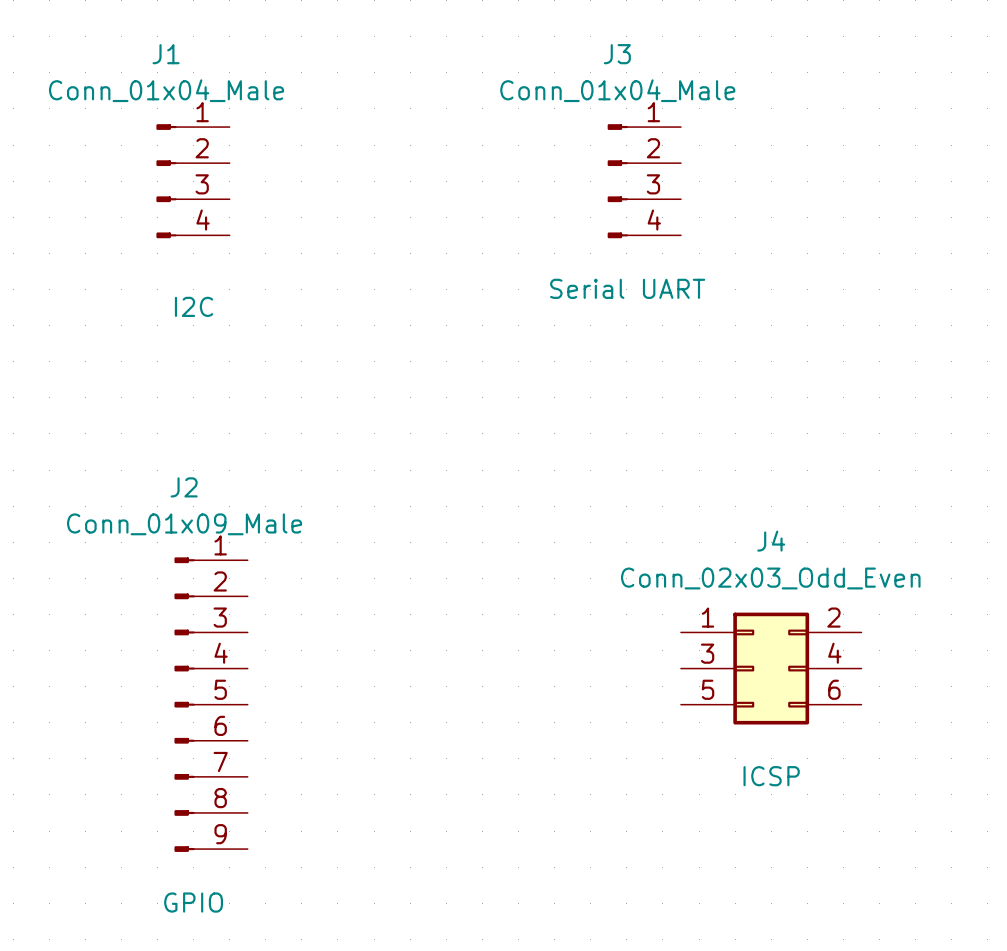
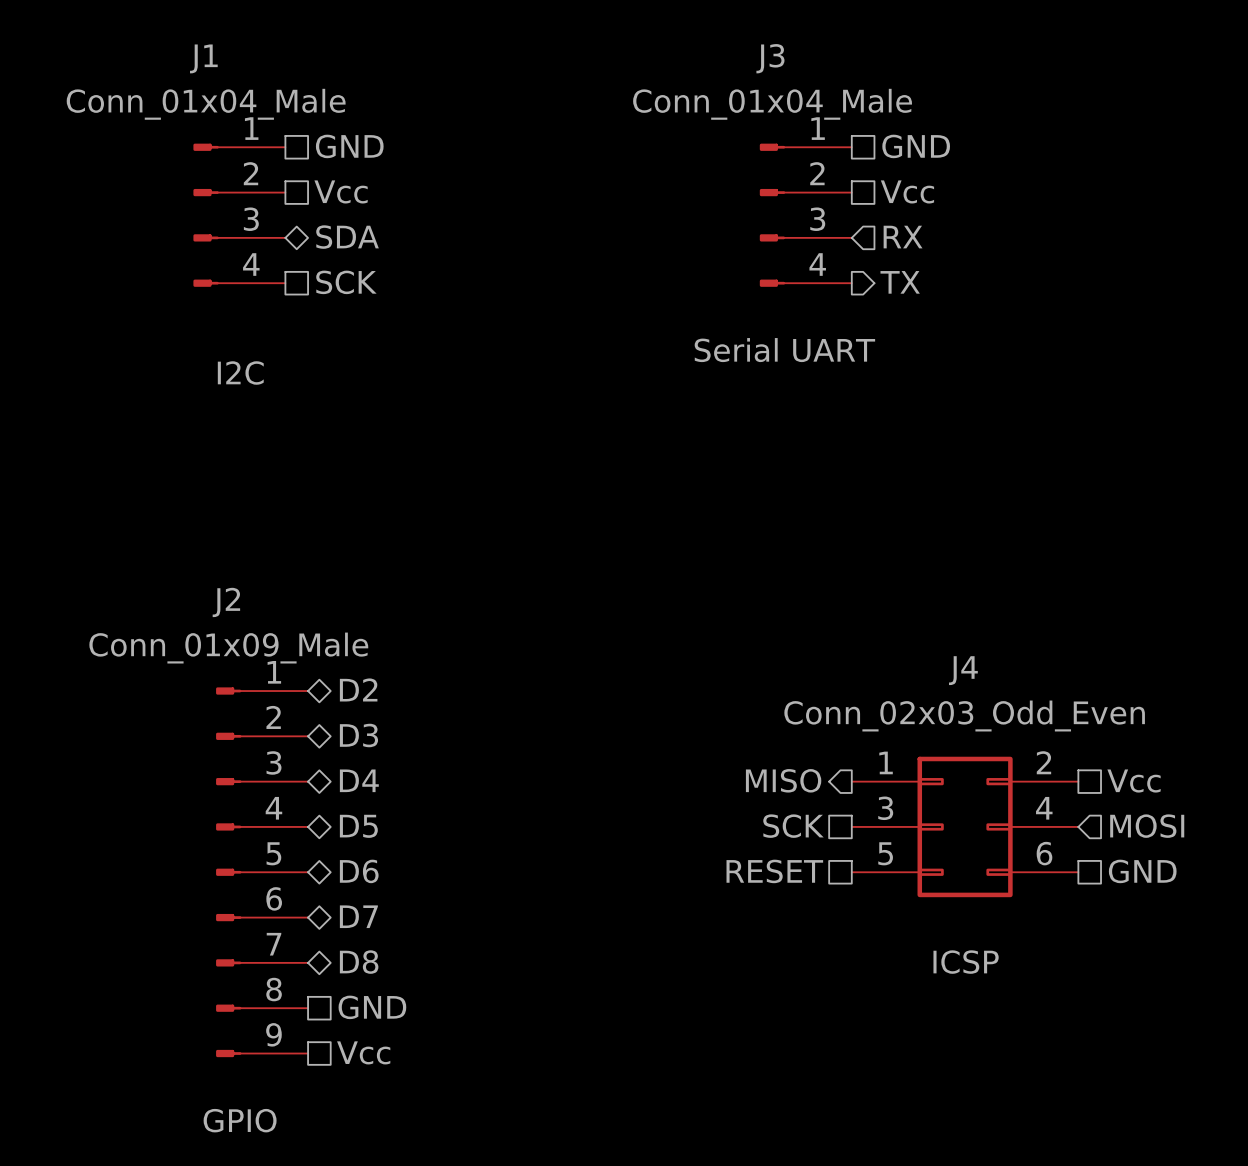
hierarchical label: none -> GND (349, 146)
hierarchical label: none -> GND (916, 146)
hierarchical label: none -> Vcc (341, 191)
hierarchical label: none -> Vcc (907, 191)
hierarchical label: none -> SDA (347, 237)
hierarchical label: none -> RX (903, 237)
hierarchical label: none -> SCK (346, 282)
hierarchical label: none -> TX (900, 282)
hierarchical label: none -> D2 (358, 689)
hierarchical label: none -> D3 (358, 735)
hierarchical label: none -> D4 (359, 780)
hierarchical label: none -> MISO (783, 780)
hierarchical label: none -> Vcc (1134, 781)
hierarchical label: none -> D5 (358, 826)
hierarchical label: none -> SCK (793, 826)
hierarchical label: none -> MOSI (1147, 826)
hierarchical label: none -> D6 (359, 871)
hierarchical label: none -> RESET (774, 871)
hierarchical label: none -> GND (1142, 871)
hierarchical label: none -> D7 (358, 916)
hierarchical label: none -> D8 (359, 962)
hierarchical label: none -> GND (372, 1007)
hierarchical label: none -> Vcc (363, 1052)

